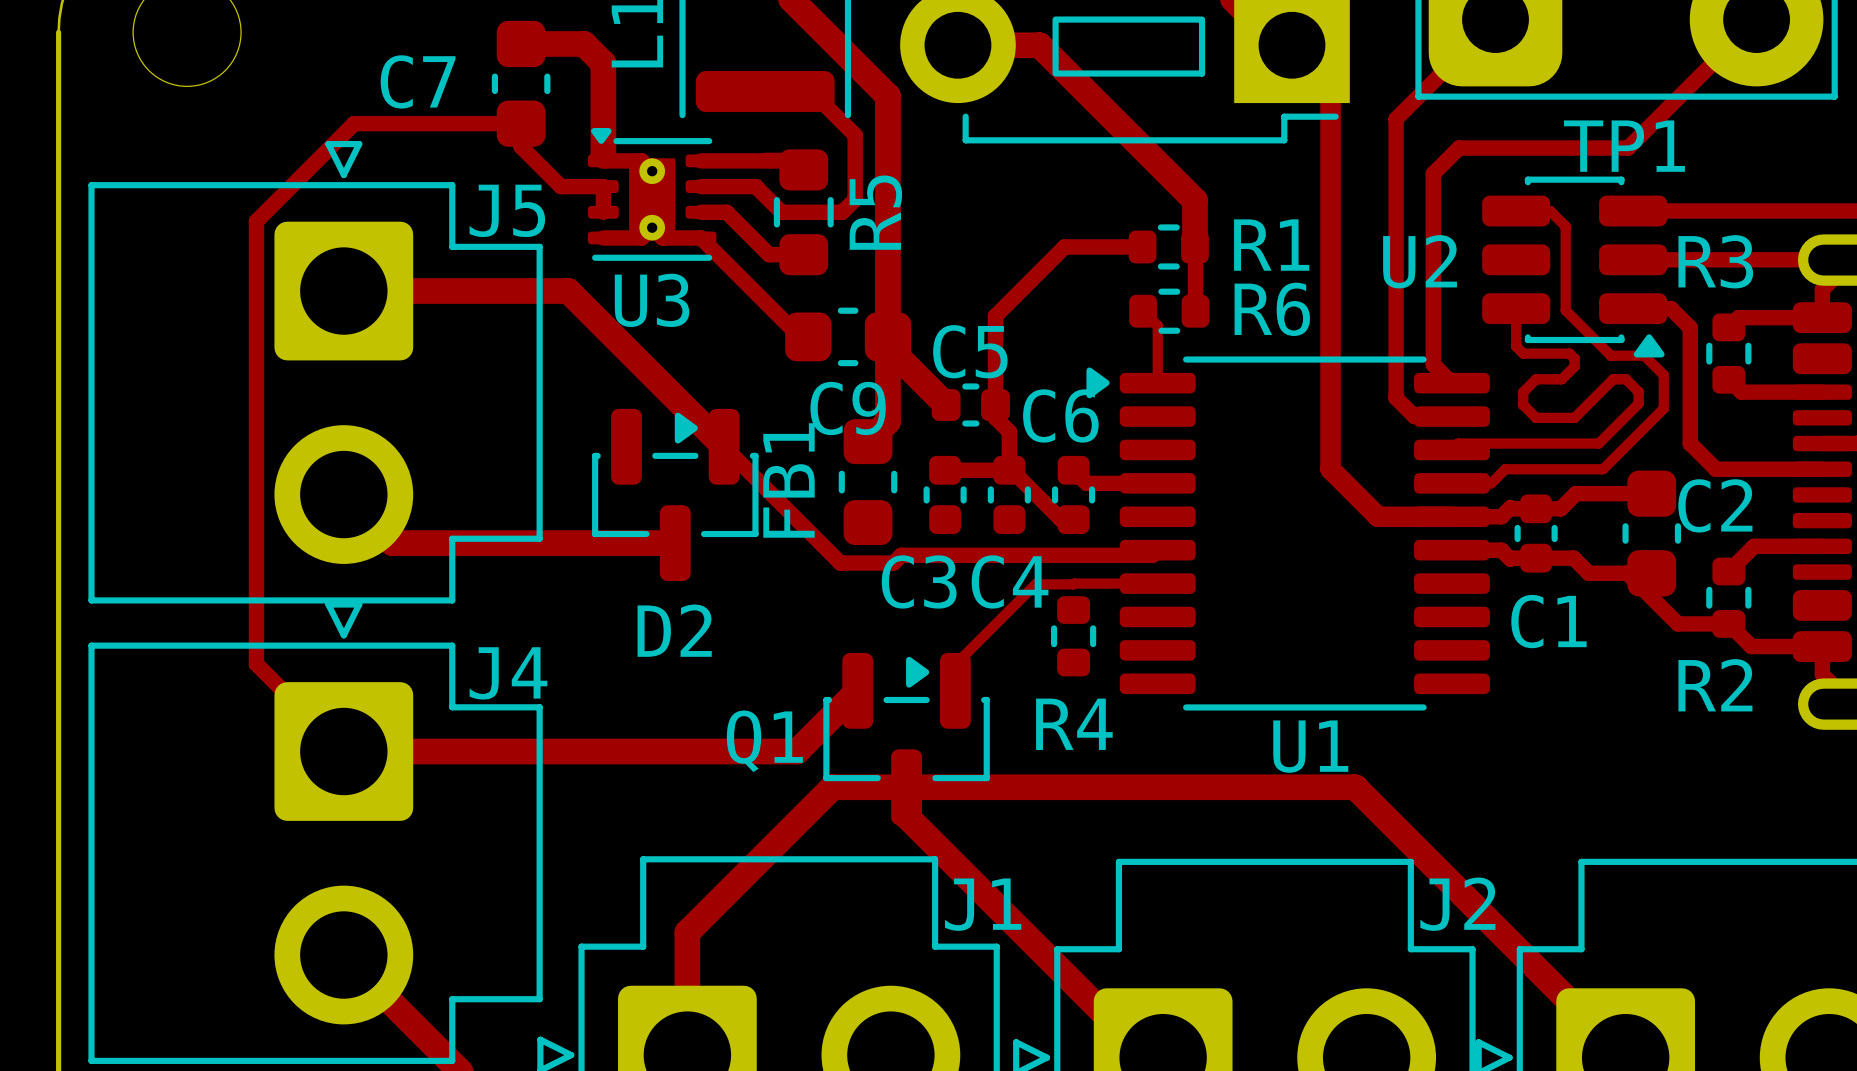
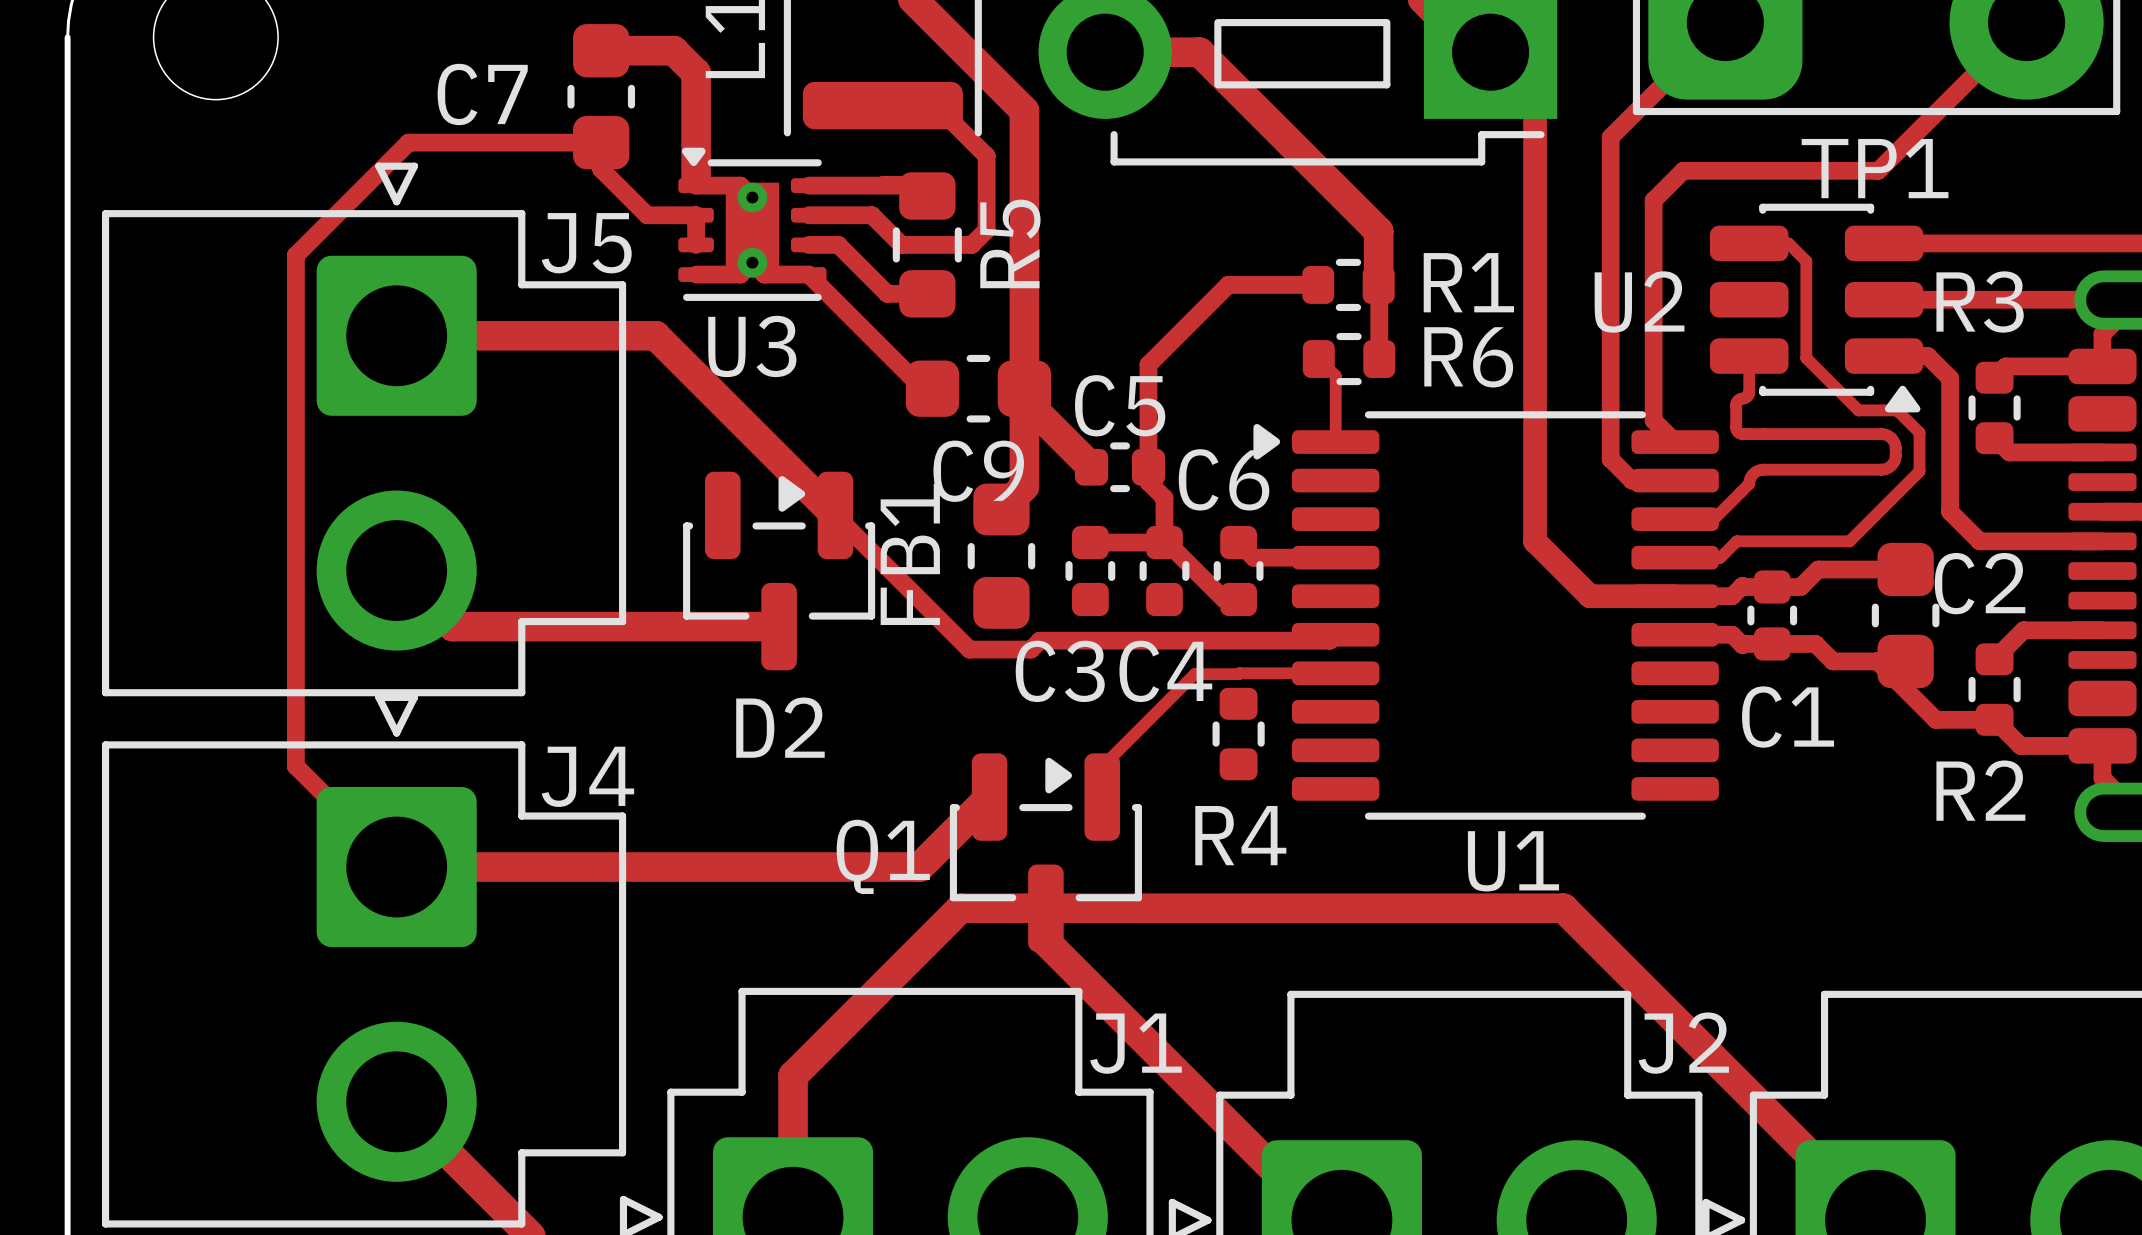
track: (1516, 339) (1516, 346) (1523, 353) (1569, 353) (1574, 358) (1574, 366) (1561, 379) (1536, 379) (1523, 392) (1523, 405) (1536, 417) (1574, 417) (1613, 379) (1626, 379) (1638, 391) (1638, 403) (1598, 443) (1458, 443) (1451, 449) -> (1749, 392) (1747, 396) (1739, 399) (1736, 403) (1736, 428) (1739, 433) (1884, 434) (1890, 437) (1894, 443) (1894, 461) (1889, 467) (1883, 469) (1760, 470) (1753, 473) (1749, 483) (1714, 519) (1675, 519)

